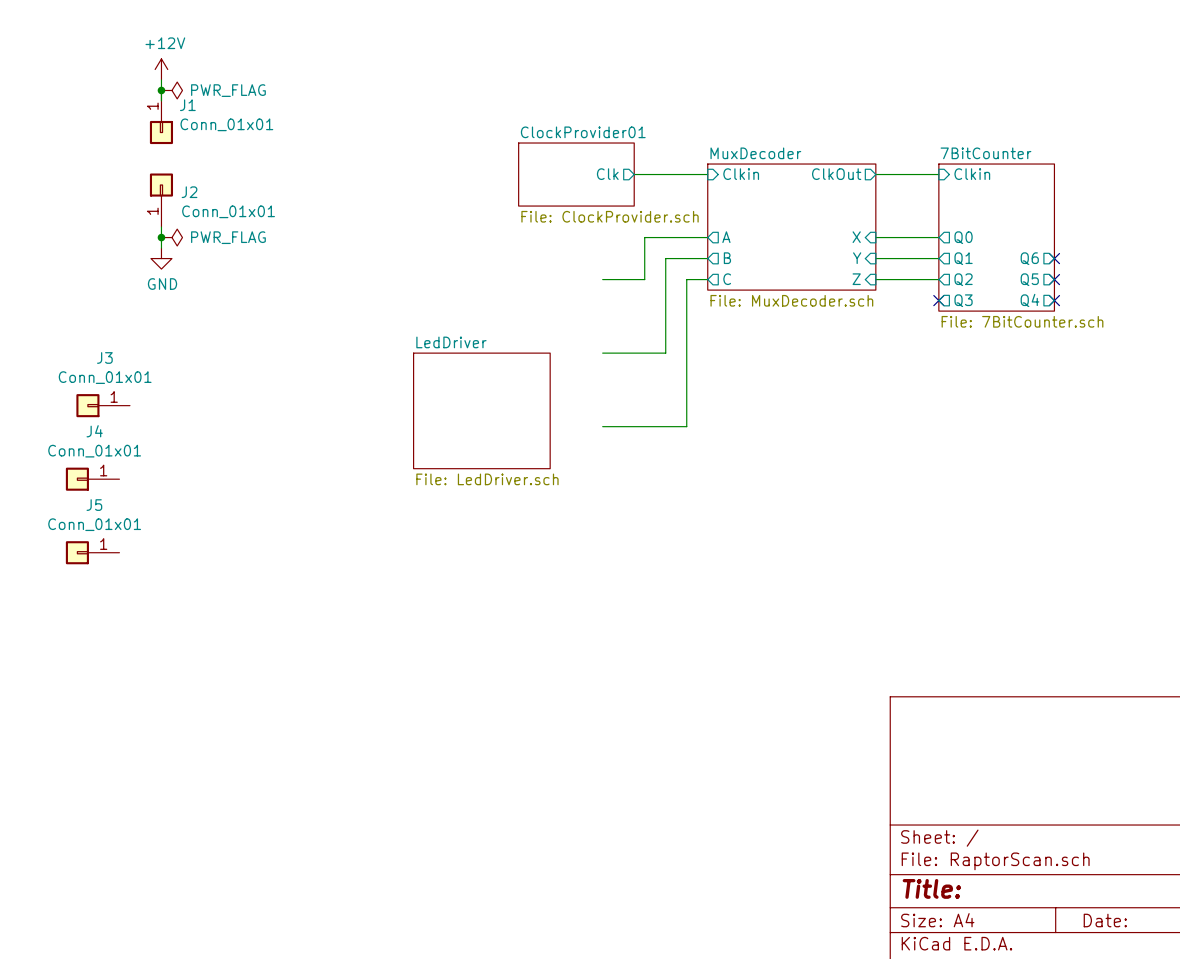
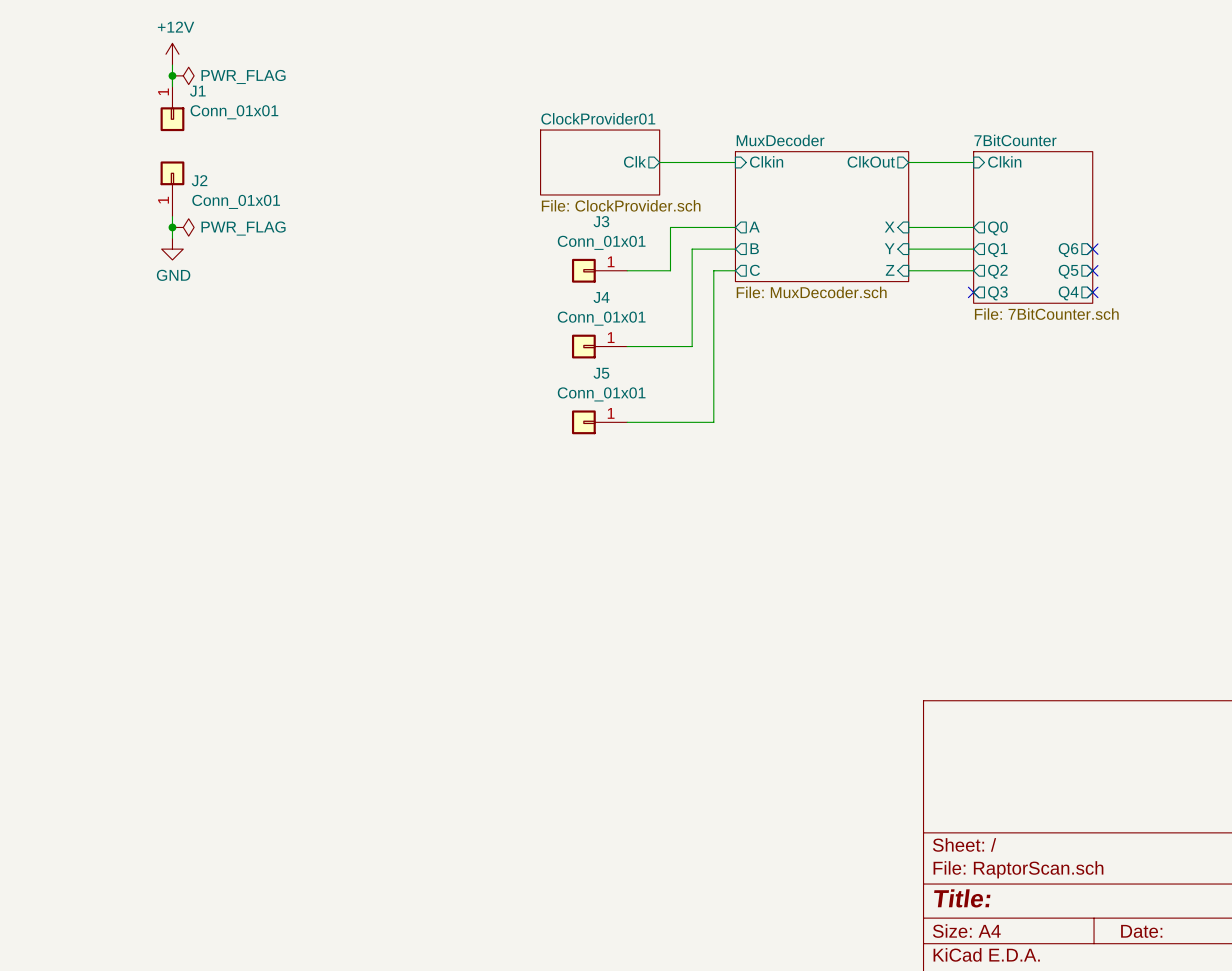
J3 position: (103, 405) -> (599, 270)
sheet LedDriver: File: LedDriver.sch (481, 410) -> none
J4 position: (92, 479) -> (599, 346)
J5 position: (92, 552) -> (599, 422)

